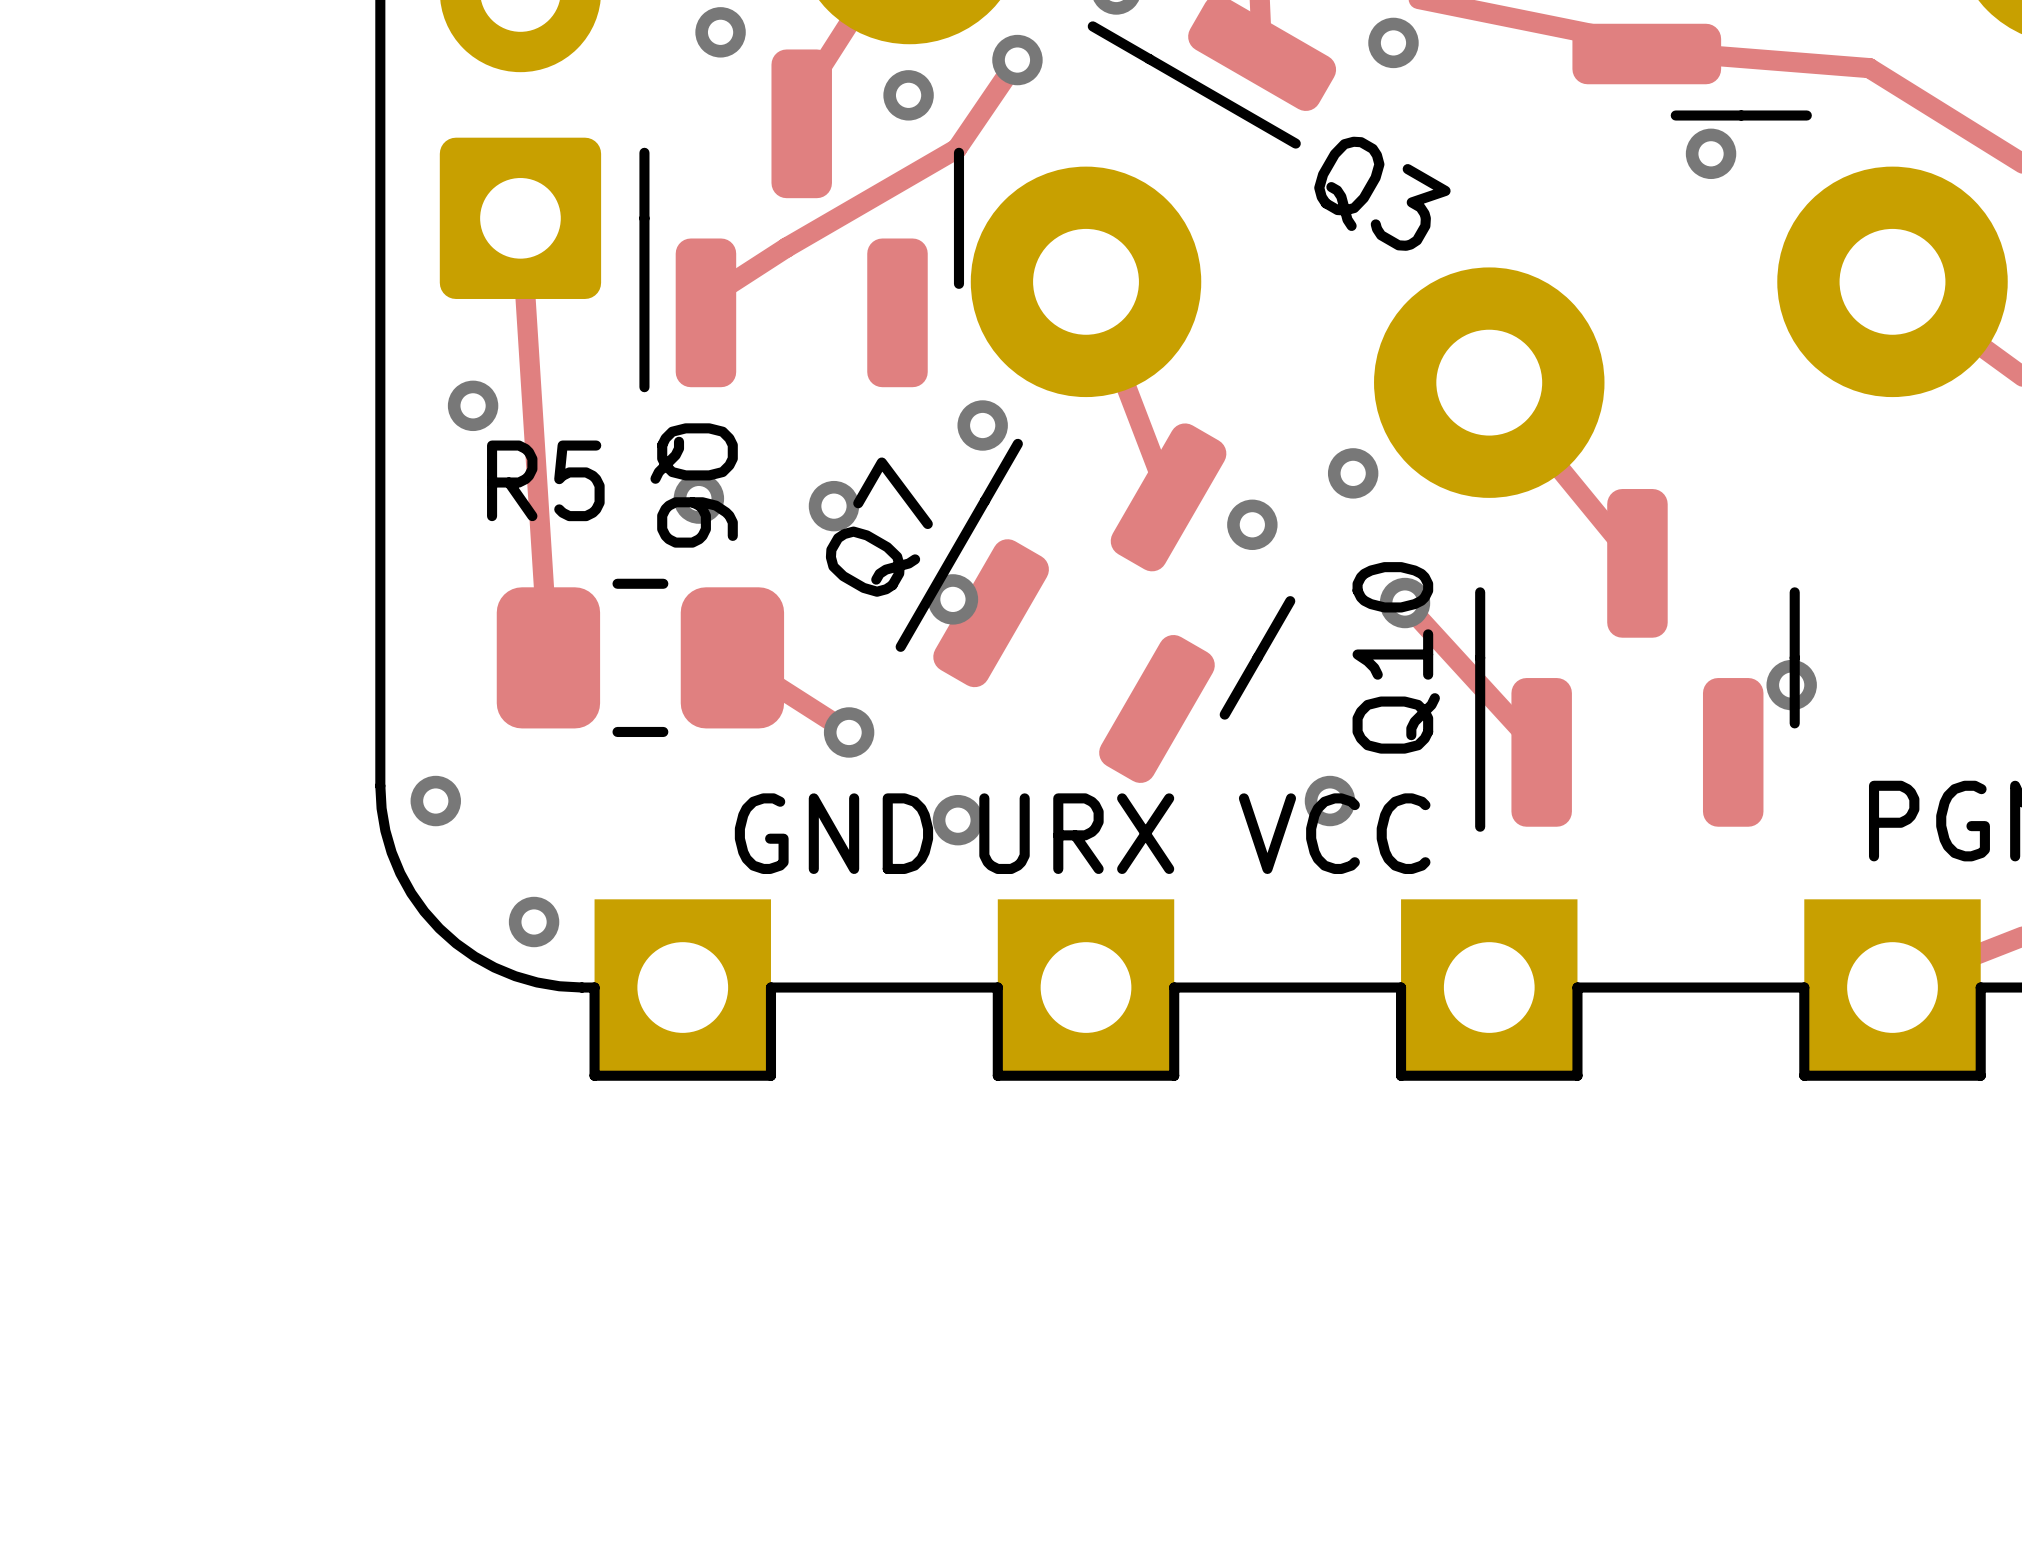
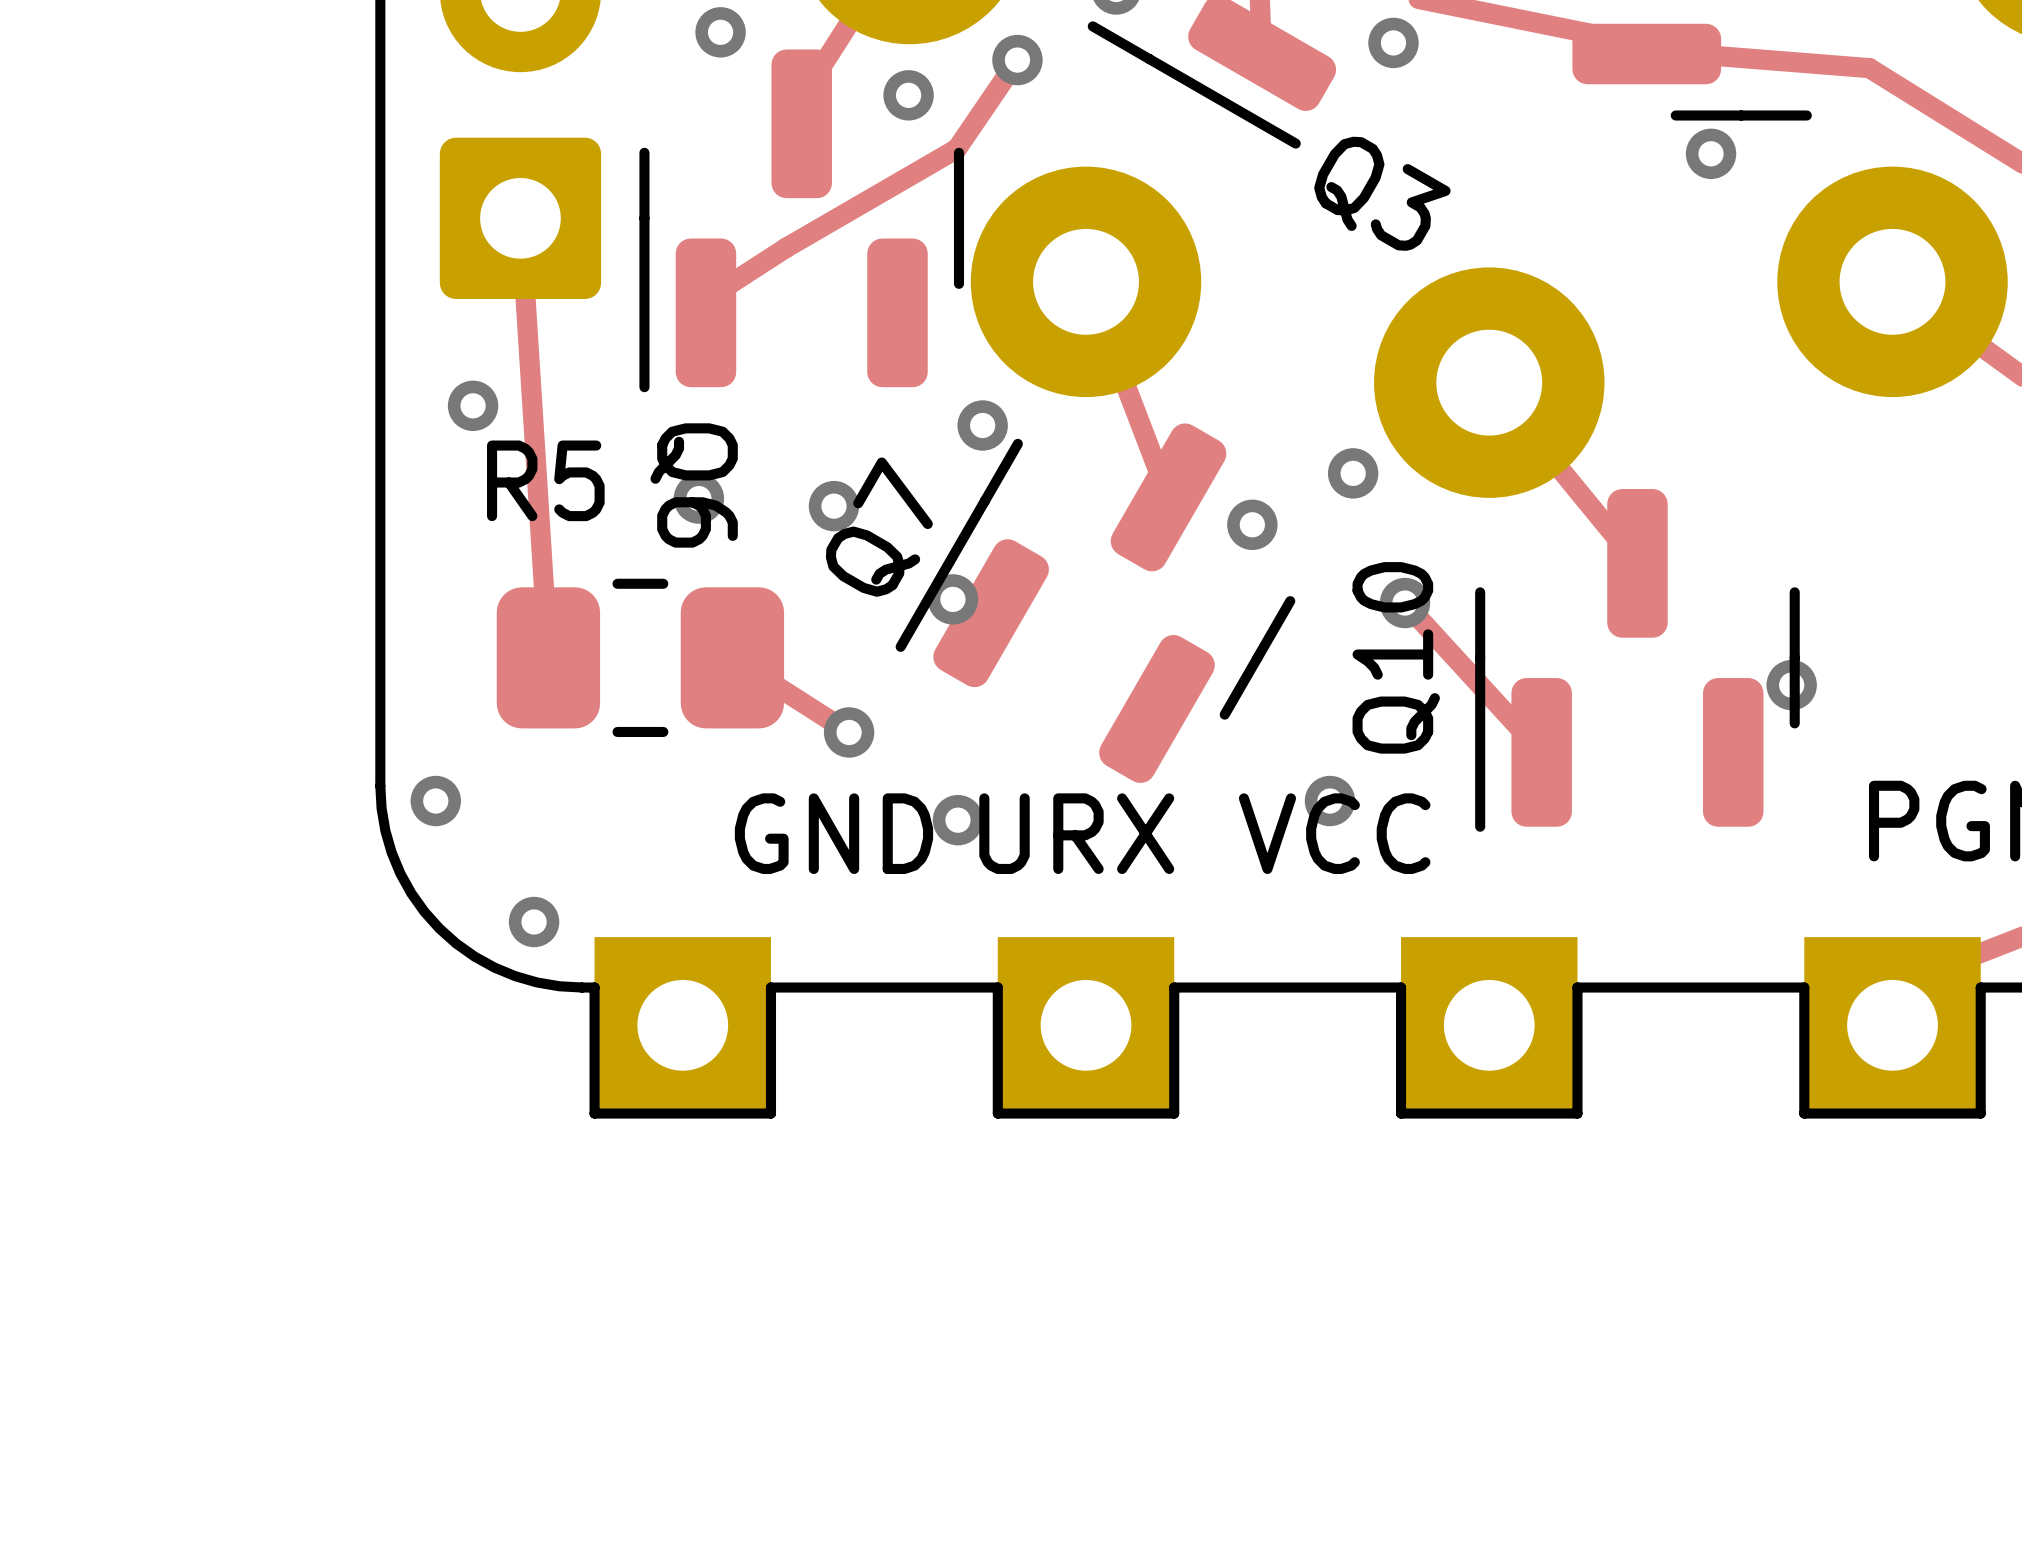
part position: (682, 987) -> (682, 1025)
part position: (1086, 987) -> (1086, 1025)
part position: (1489, 987) -> (1489, 1025)
part position: (1892, 987) -> (1892, 1025)
board edge: (594, 1075) (770, 1075) -> (594, 1075) (594, 1113) (770, 1113) (770, 1075)
board edge: (997, 1075) (1174, 1075) -> (997, 1075) (997, 1113) (1174, 1113) (1174, 1075)
board edge: (1401, 1075) (1577, 1075) -> (1401, 1075) (1401, 1113) (1577, 1113) (1577, 1075)
board edge: (1804, 1075) (1980, 1075) -> (1804, 1075) (1804, 1113) (1980, 1113) (1980, 1075)

